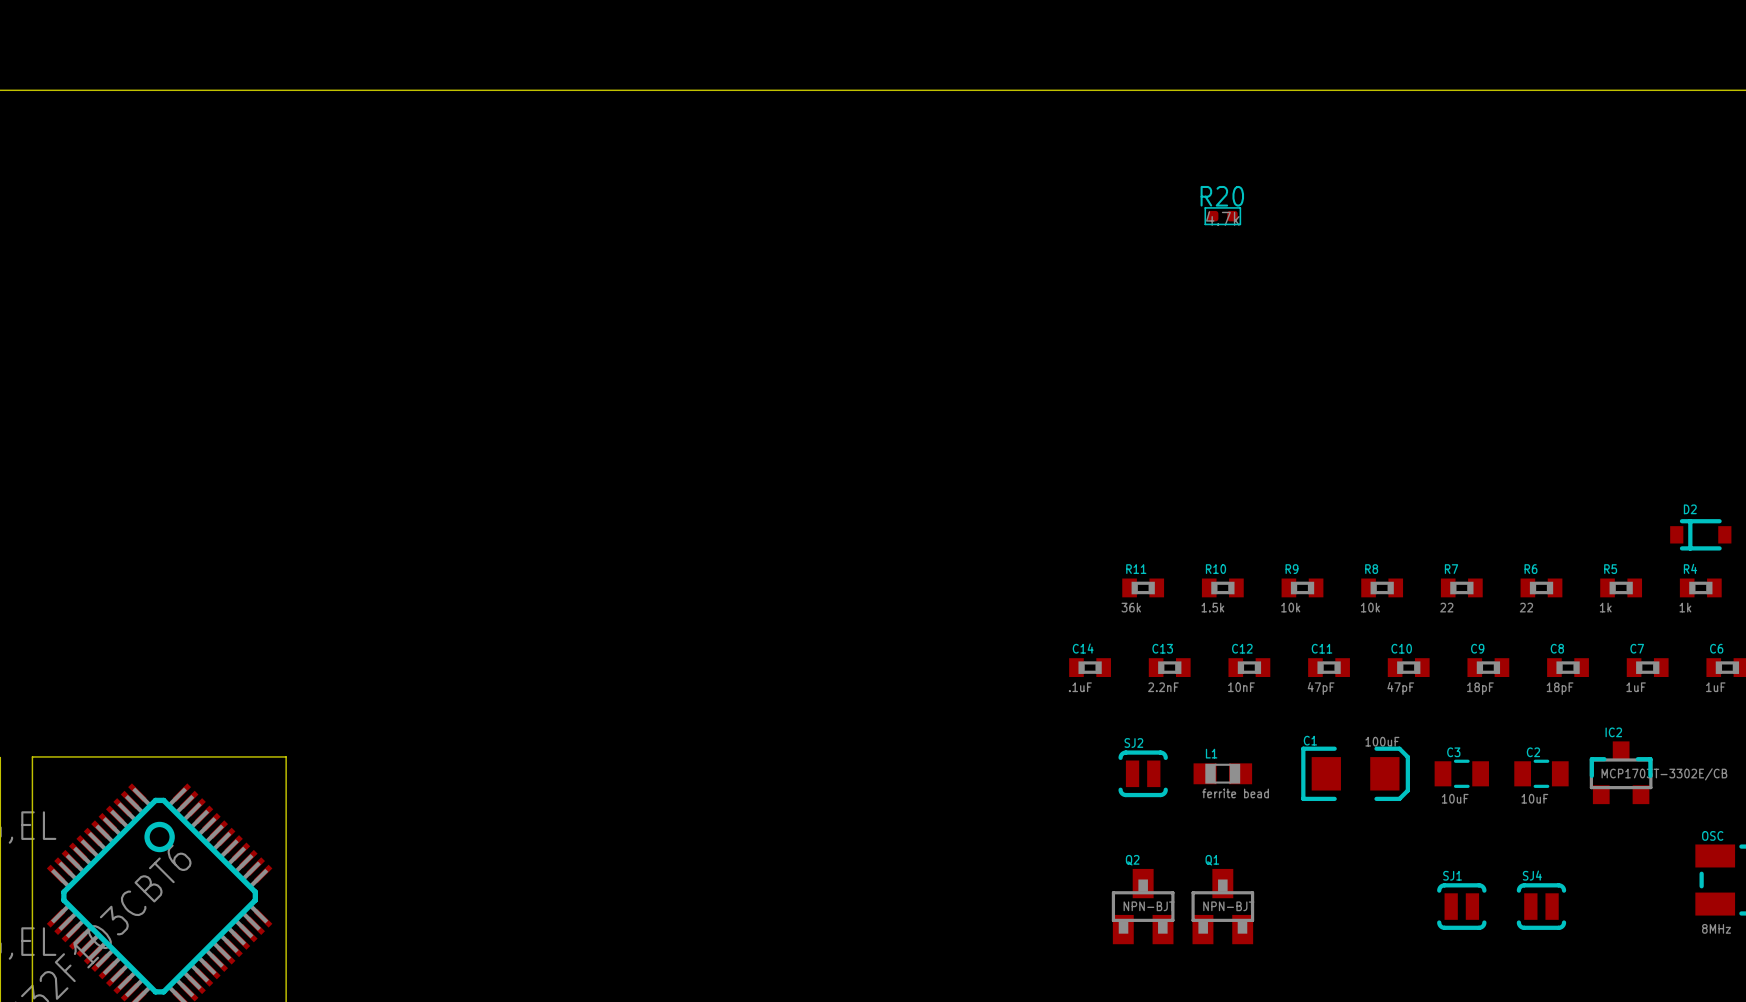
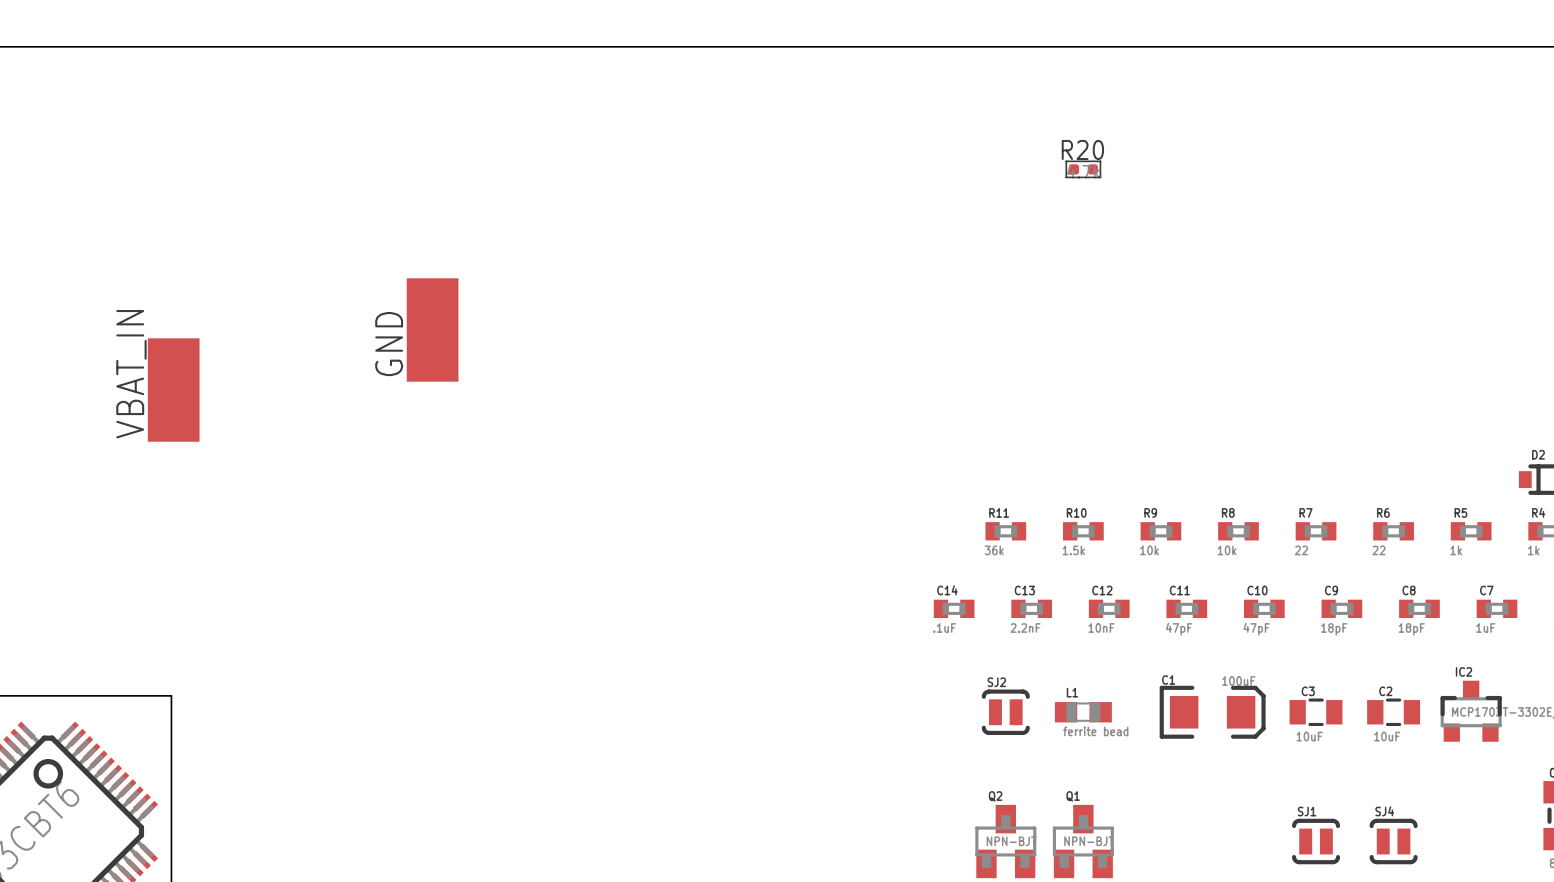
GND: none -> (432, 329)
VBAT_IN: none -> (173, 390)

